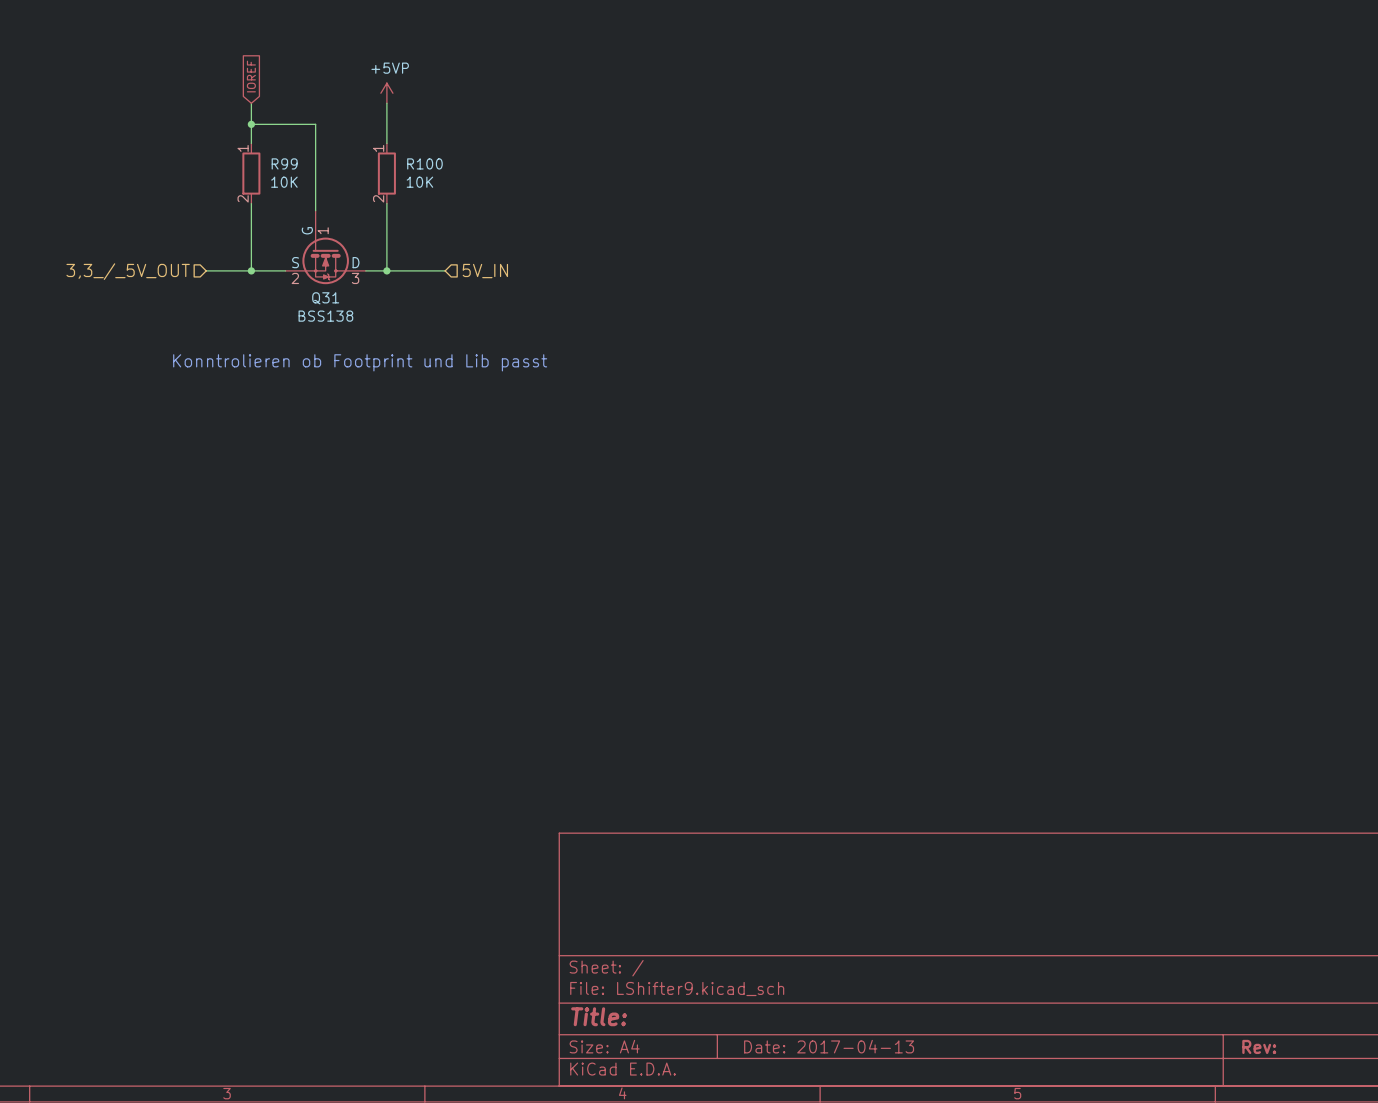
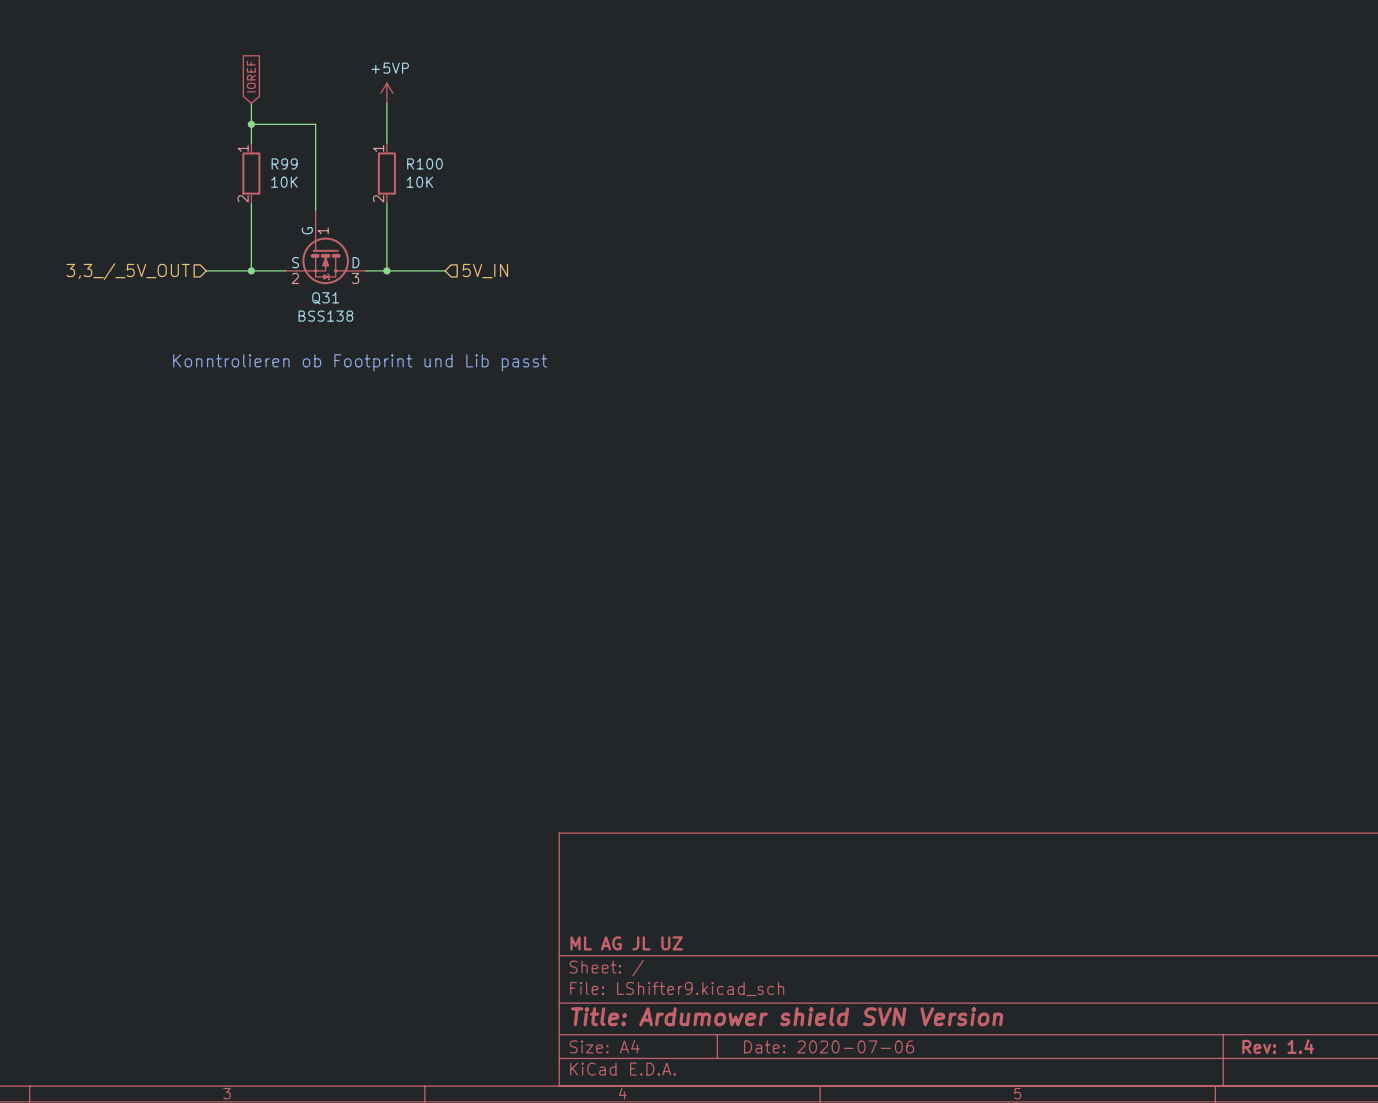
title block: none -> ML AG JL UZ (626, 943)
title block: Title: (599, 1016) -> Title: Ardumower shield SVN Version (787, 1016)
title block: Date: 2017-04-13 (829, 1046) -> Date: 2020-07-06 (829, 1046)
title block: Rev: (1259, 1046) -> Rev: 1.4 (1278, 1046)

